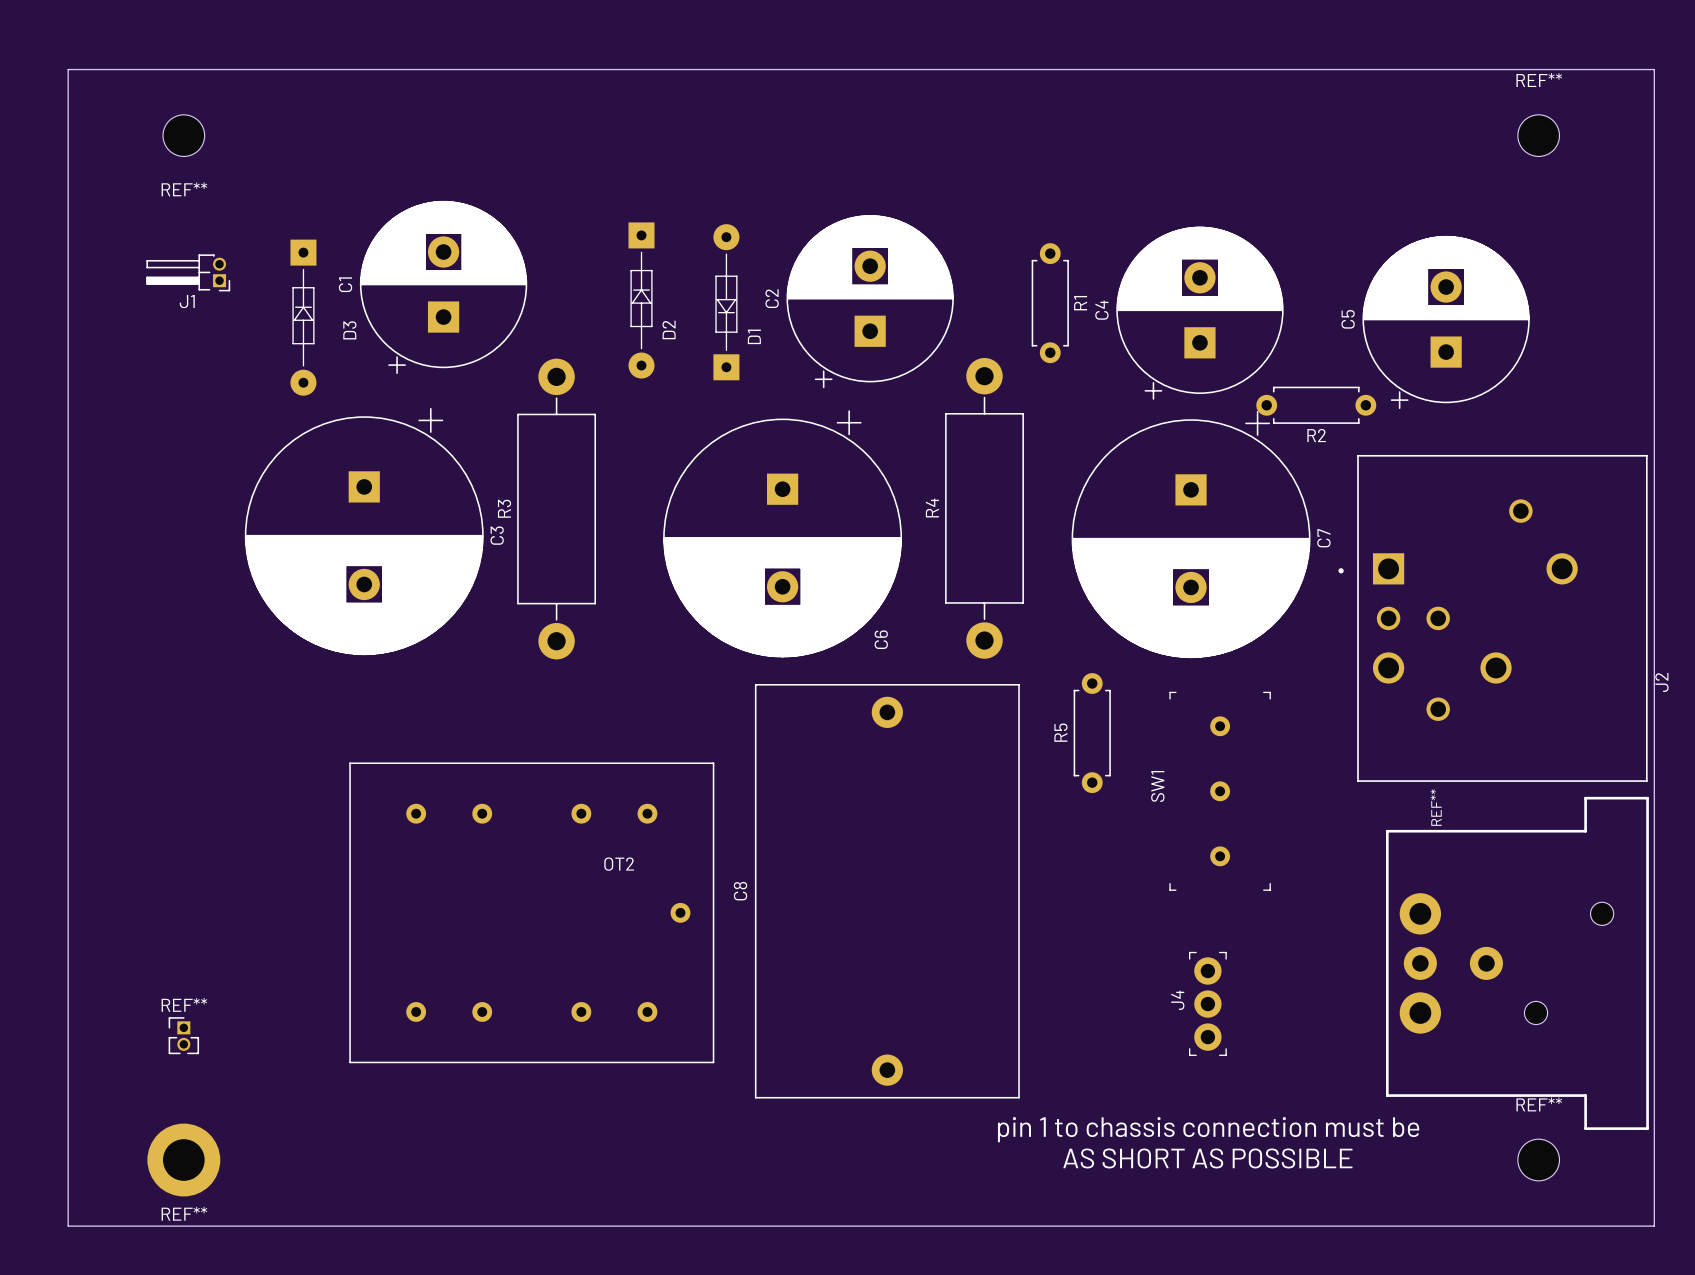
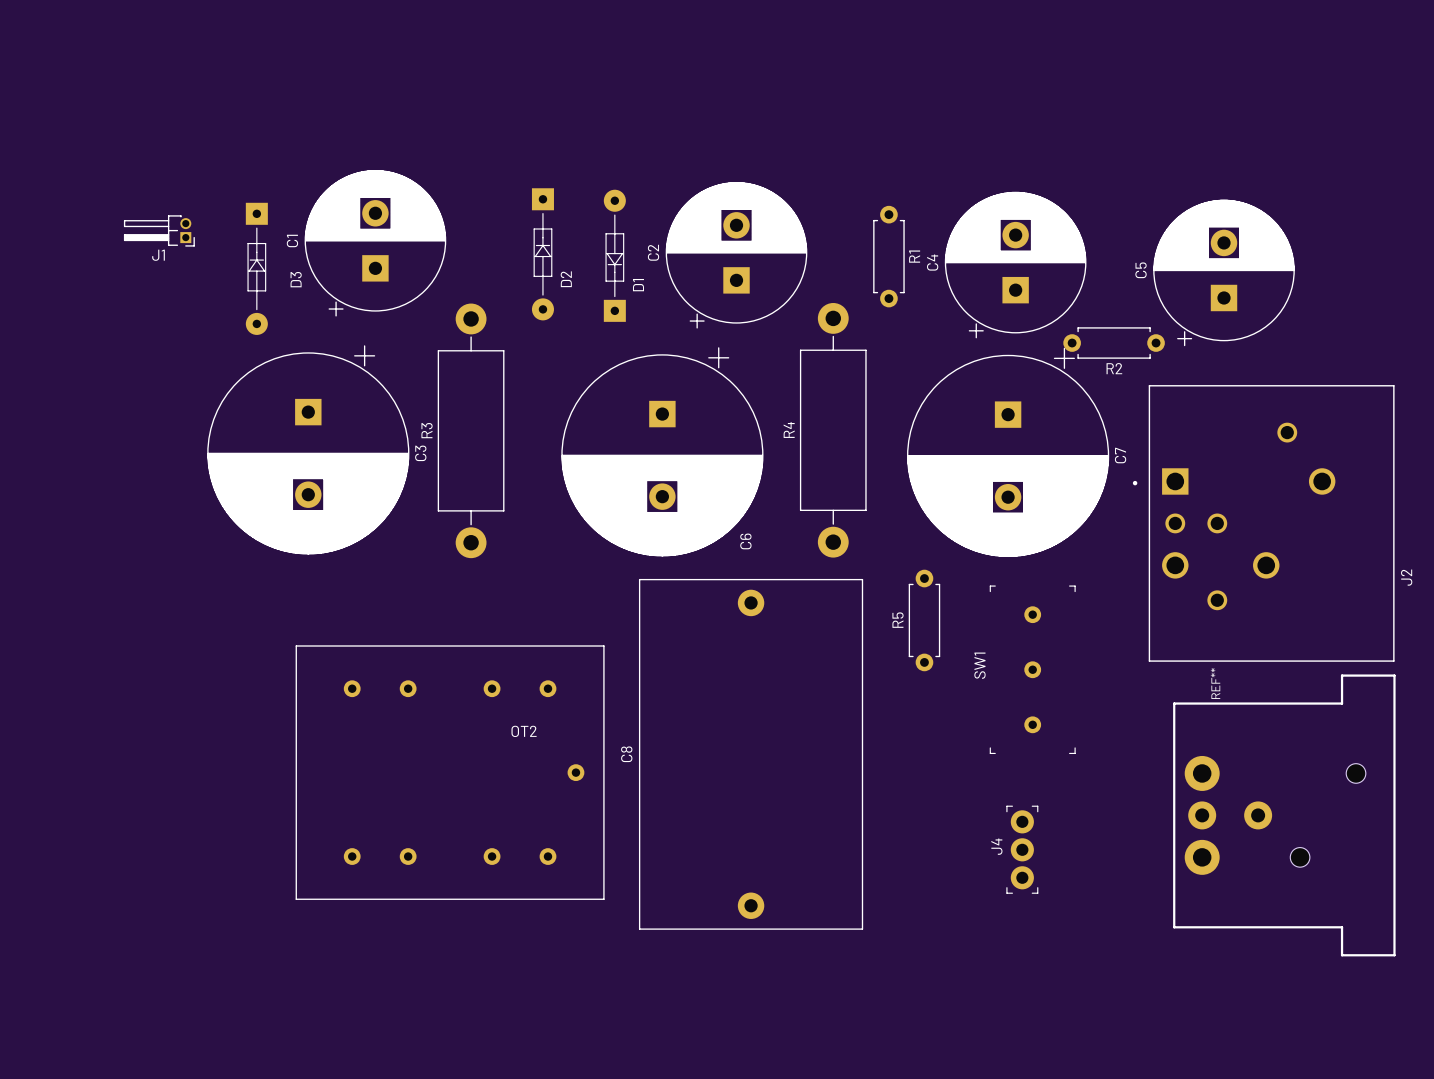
board edge: (68, 69) (68, 1226) (1654, 1226) (1654, 69) (68, 69) -> none
REF**: (183, 135) -> none
REF**: (1538, 135) -> none
REF**: (183, 1035) -> none
text: pin 1 to chassis connection must be (1208, 1129) -> none
text: AS SHORT AS POSSIBLE (1207, 1158) -> none
REF**: (183, 1160) -> none
REF**: (1538, 1160) -> none

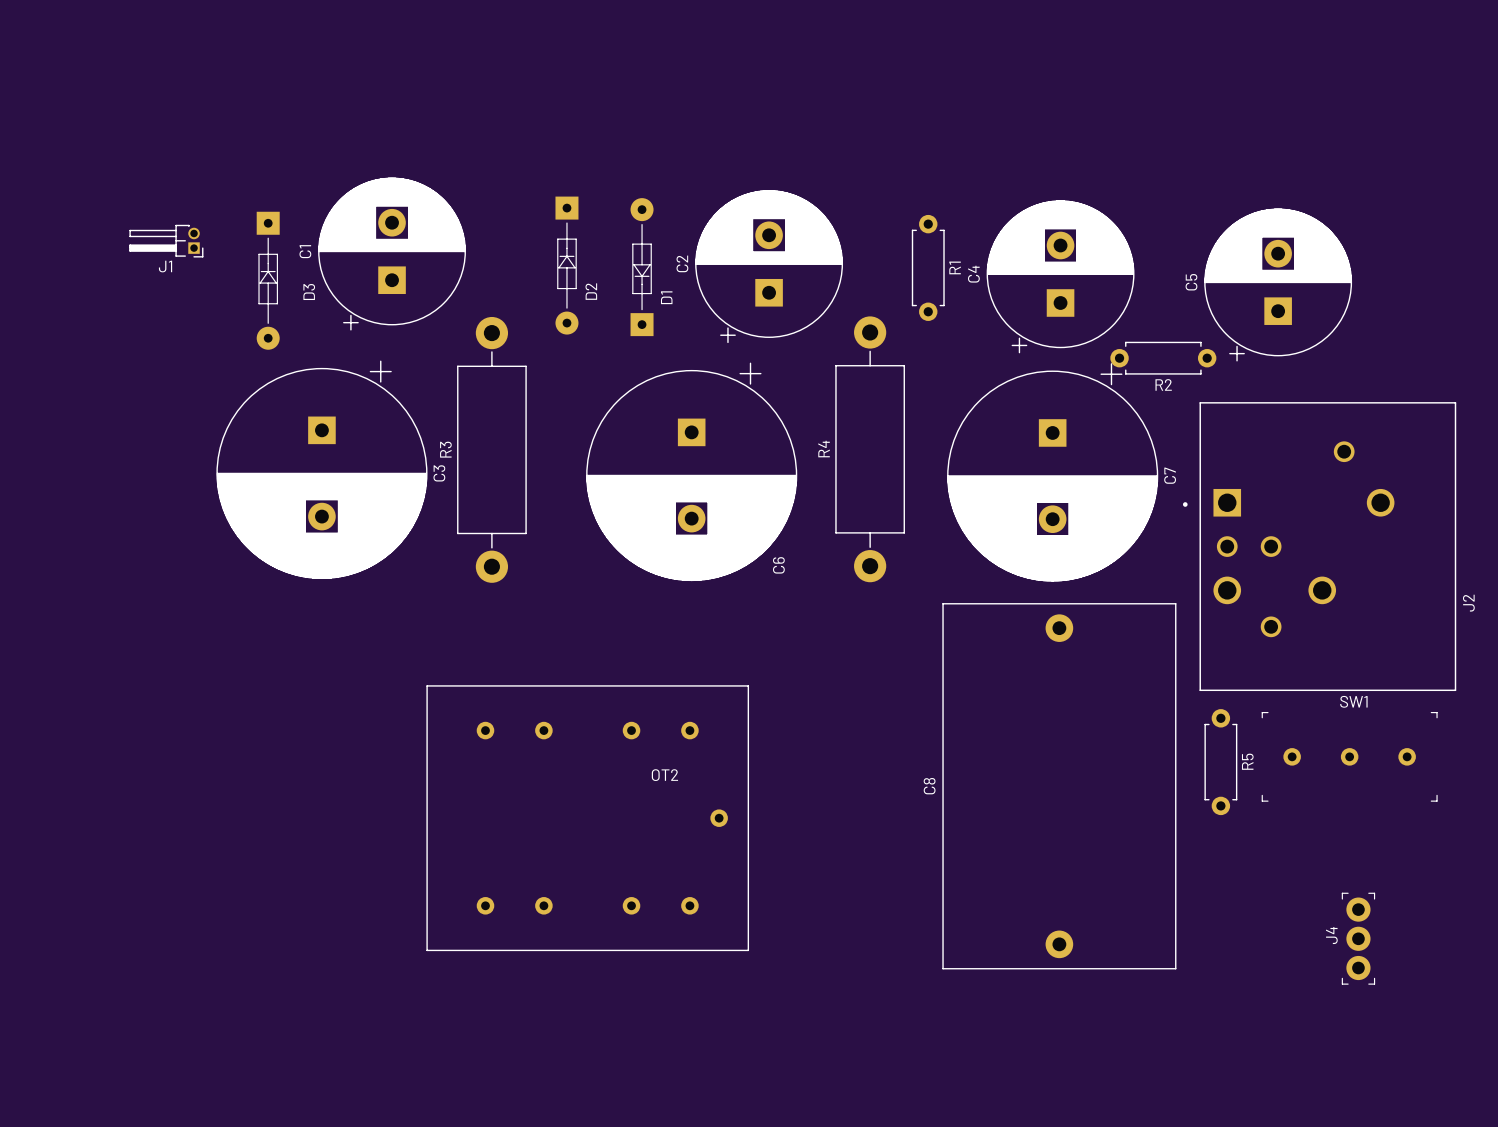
R5 name position: R5 (898, 620) -> R5 (1247, 761)
R5 position: (924, 620) -> (1220, 762)
SW1 rotation: 0° (1032, 669) -> 90° clockwise (1349, 756)
SW1 position: (1032, 669) -> (1349, 756)
C8 position: (751, 754) -> (1059, 786)
OT2 position: (450, 772) -> (587, 818)
REF**: (1284, 815) -> none
J4 position: (1022, 849) -> (1358, 938)

